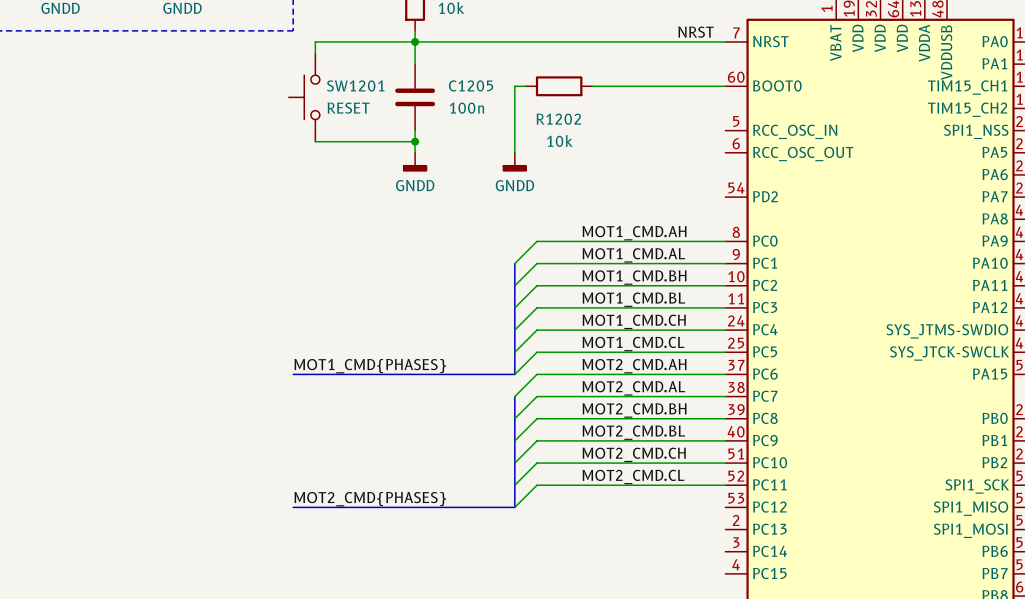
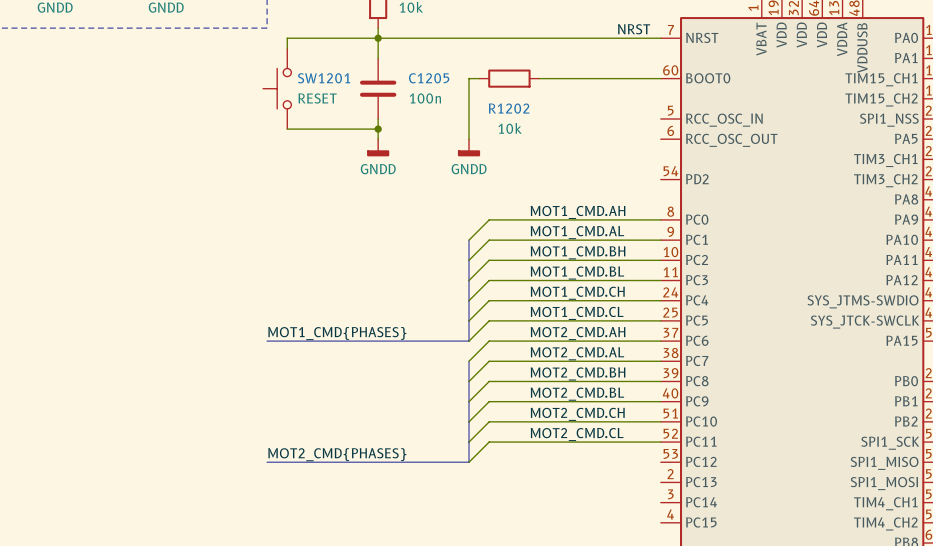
part pin name: PA6 (995, 174) -> TIM3_CH1 (885, 160)
part pin name: PA7 (995, 196) -> TIM3_CH2 (885, 180)
part pin name: PB6 (995, 551) -> TIM4_CH1 (885, 503)
part pin name: PB7 (995, 573) -> TIM4_CH2 (885, 523)

